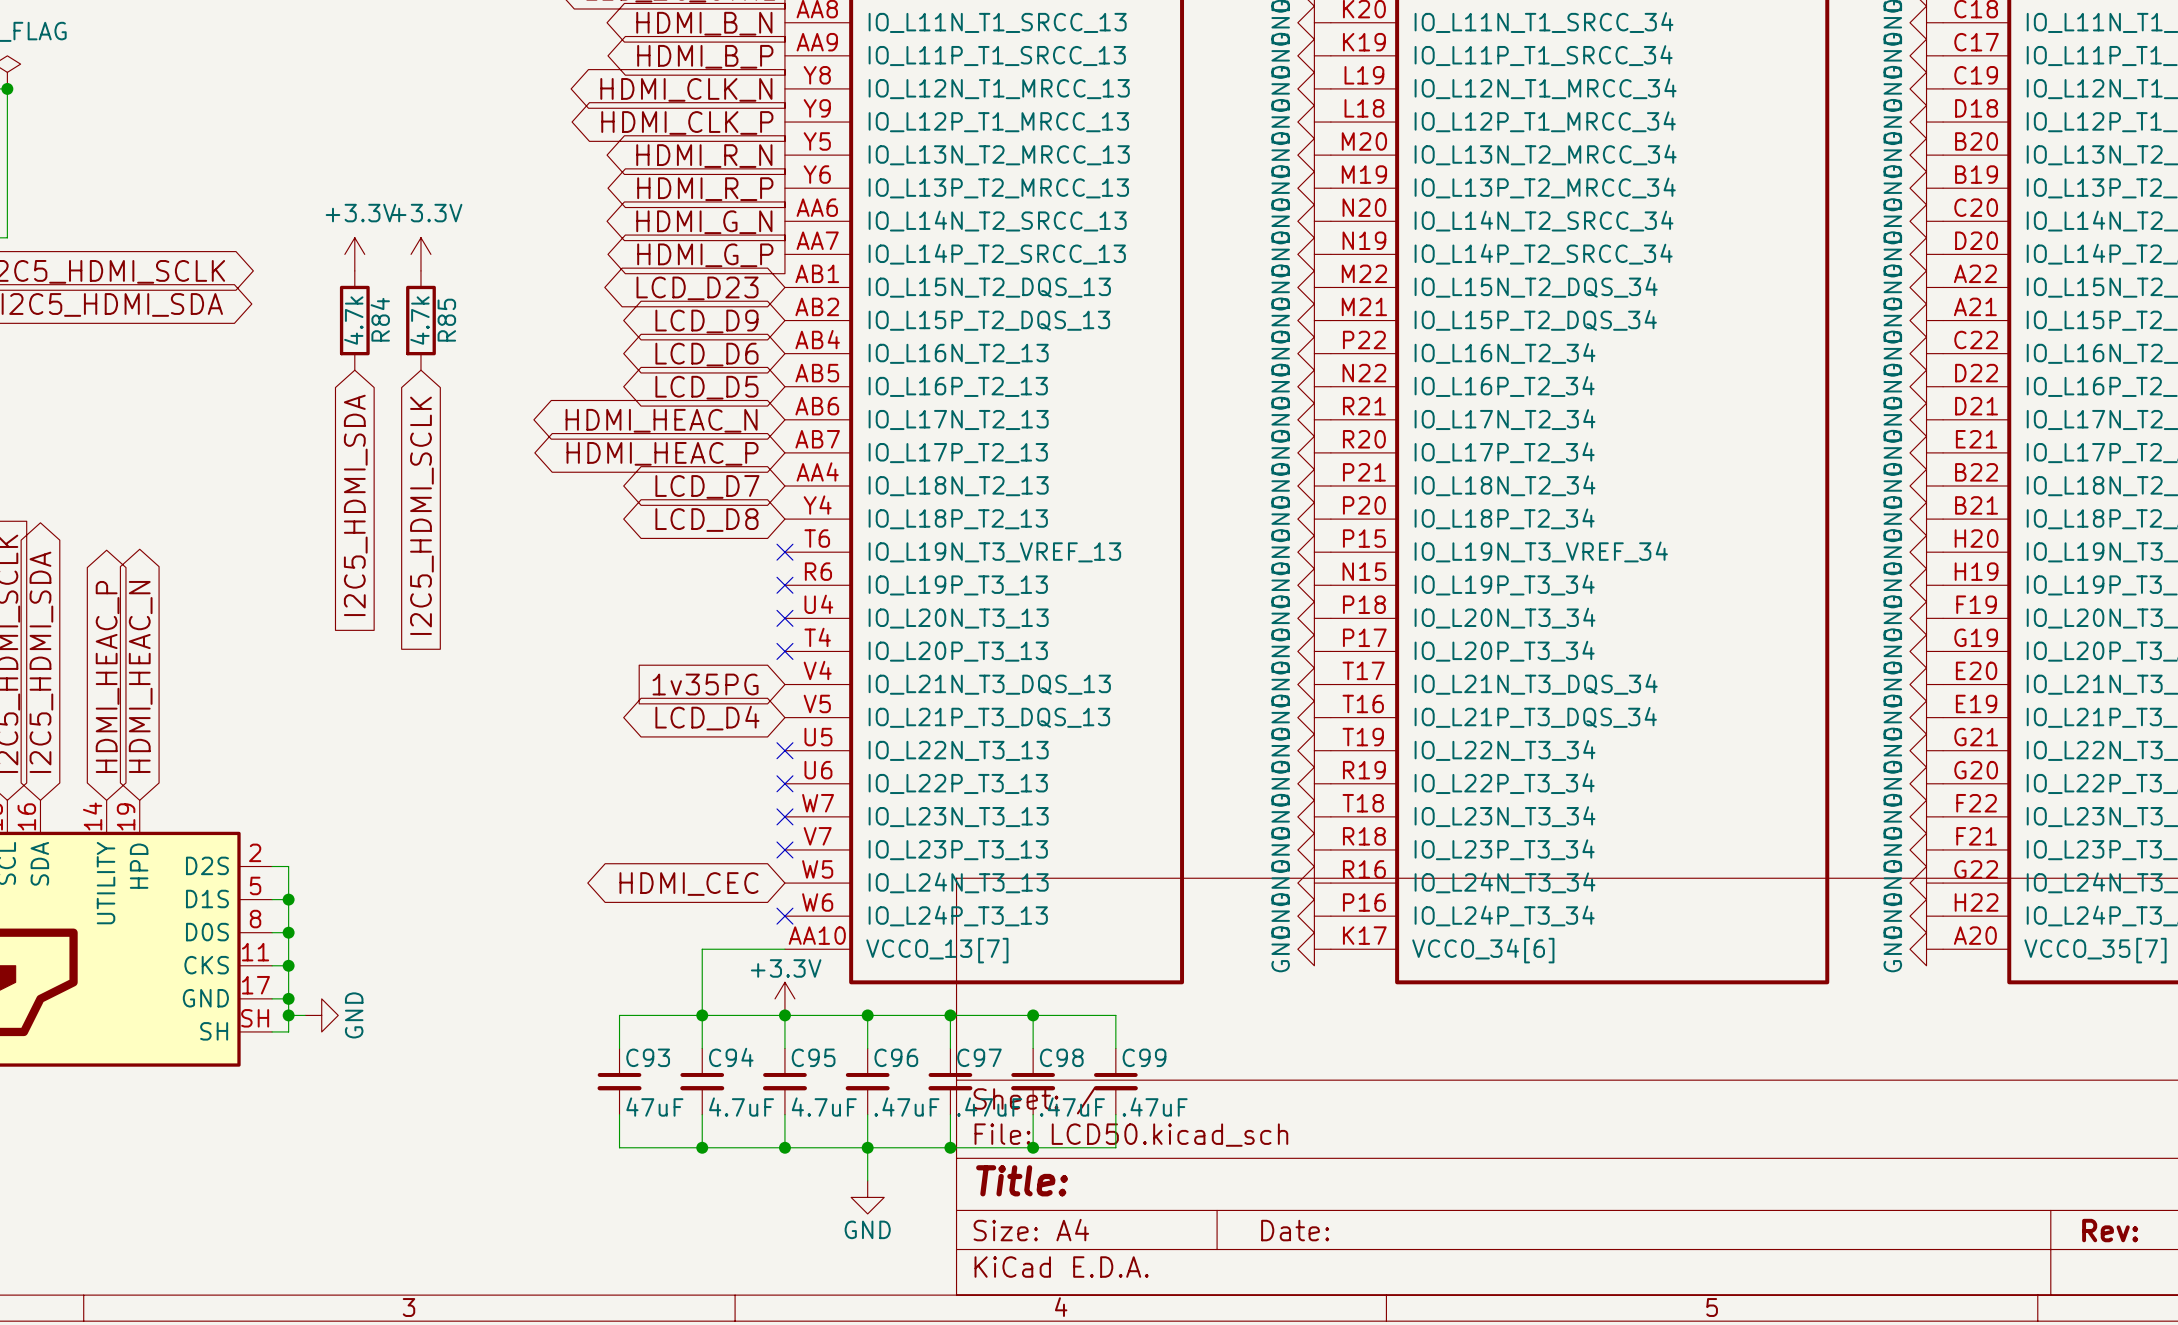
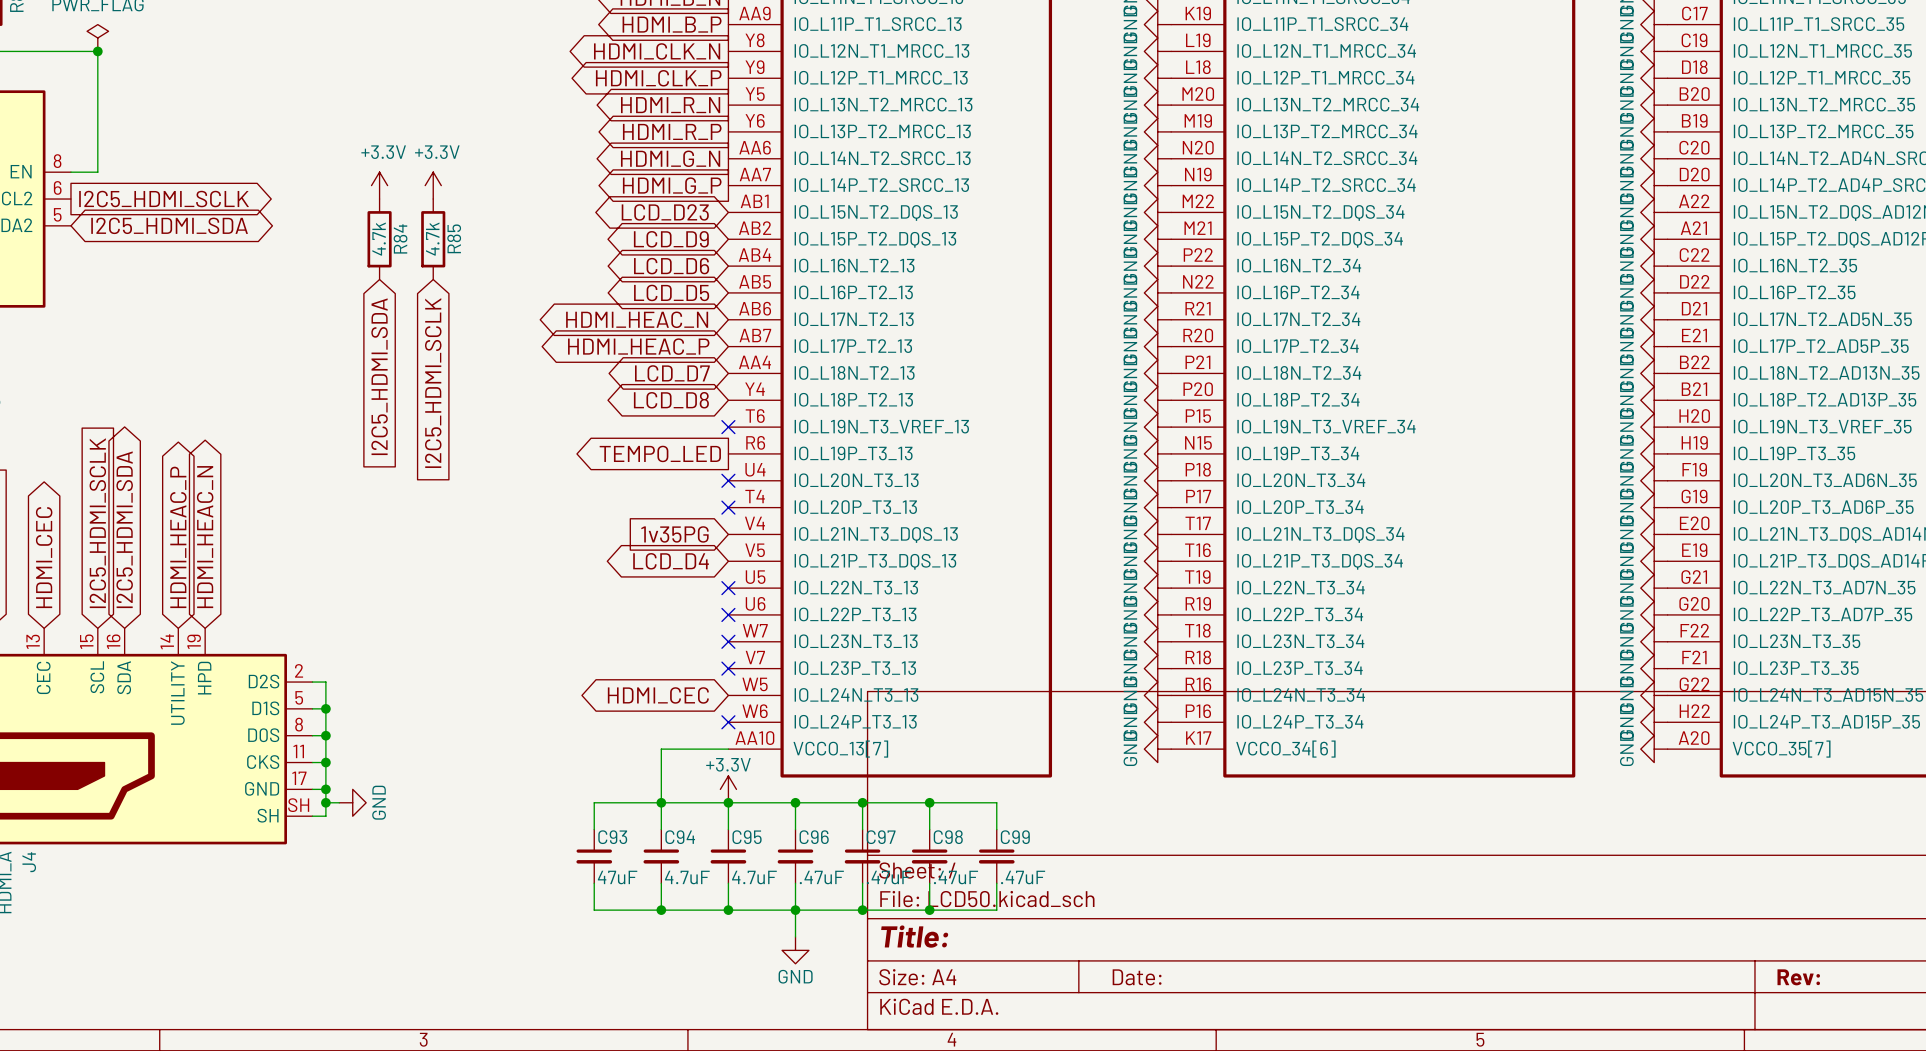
no-connect mark: (784, 585) -> none
global label: none -> TEMPO_LED (660, 453)

